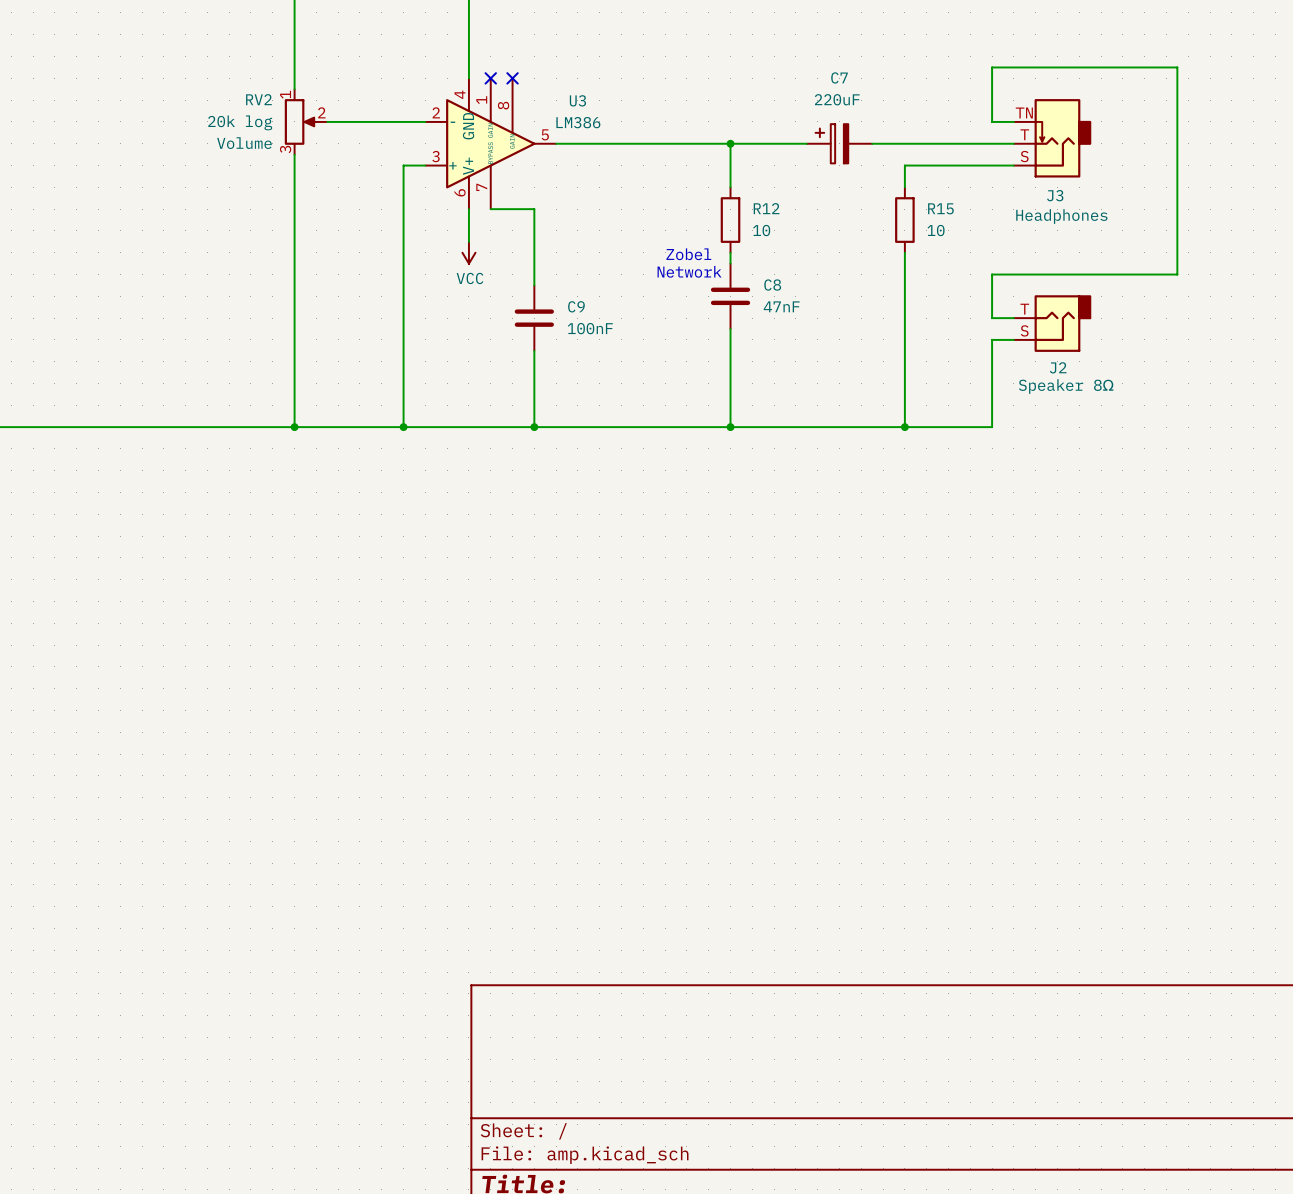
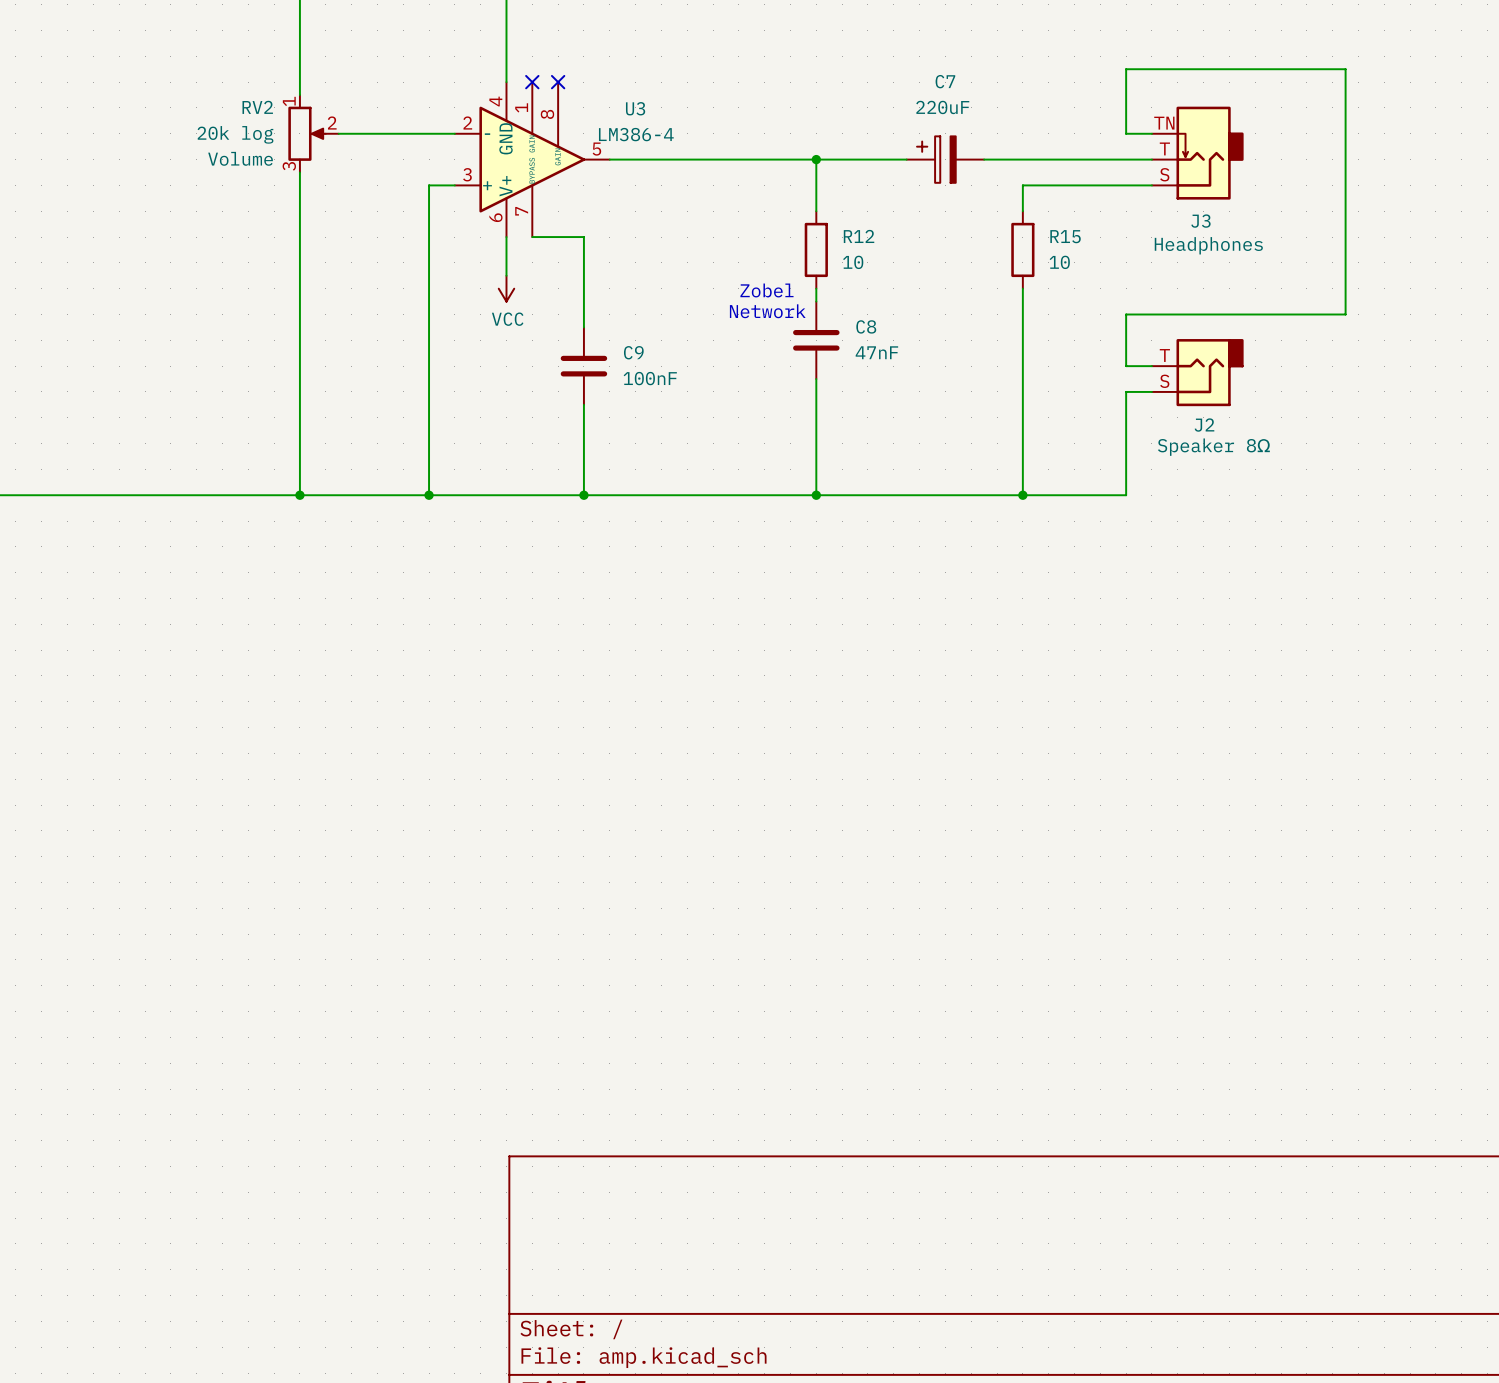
U3 value: LM386 (578, 122) -> LM386-4 (636, 134)

